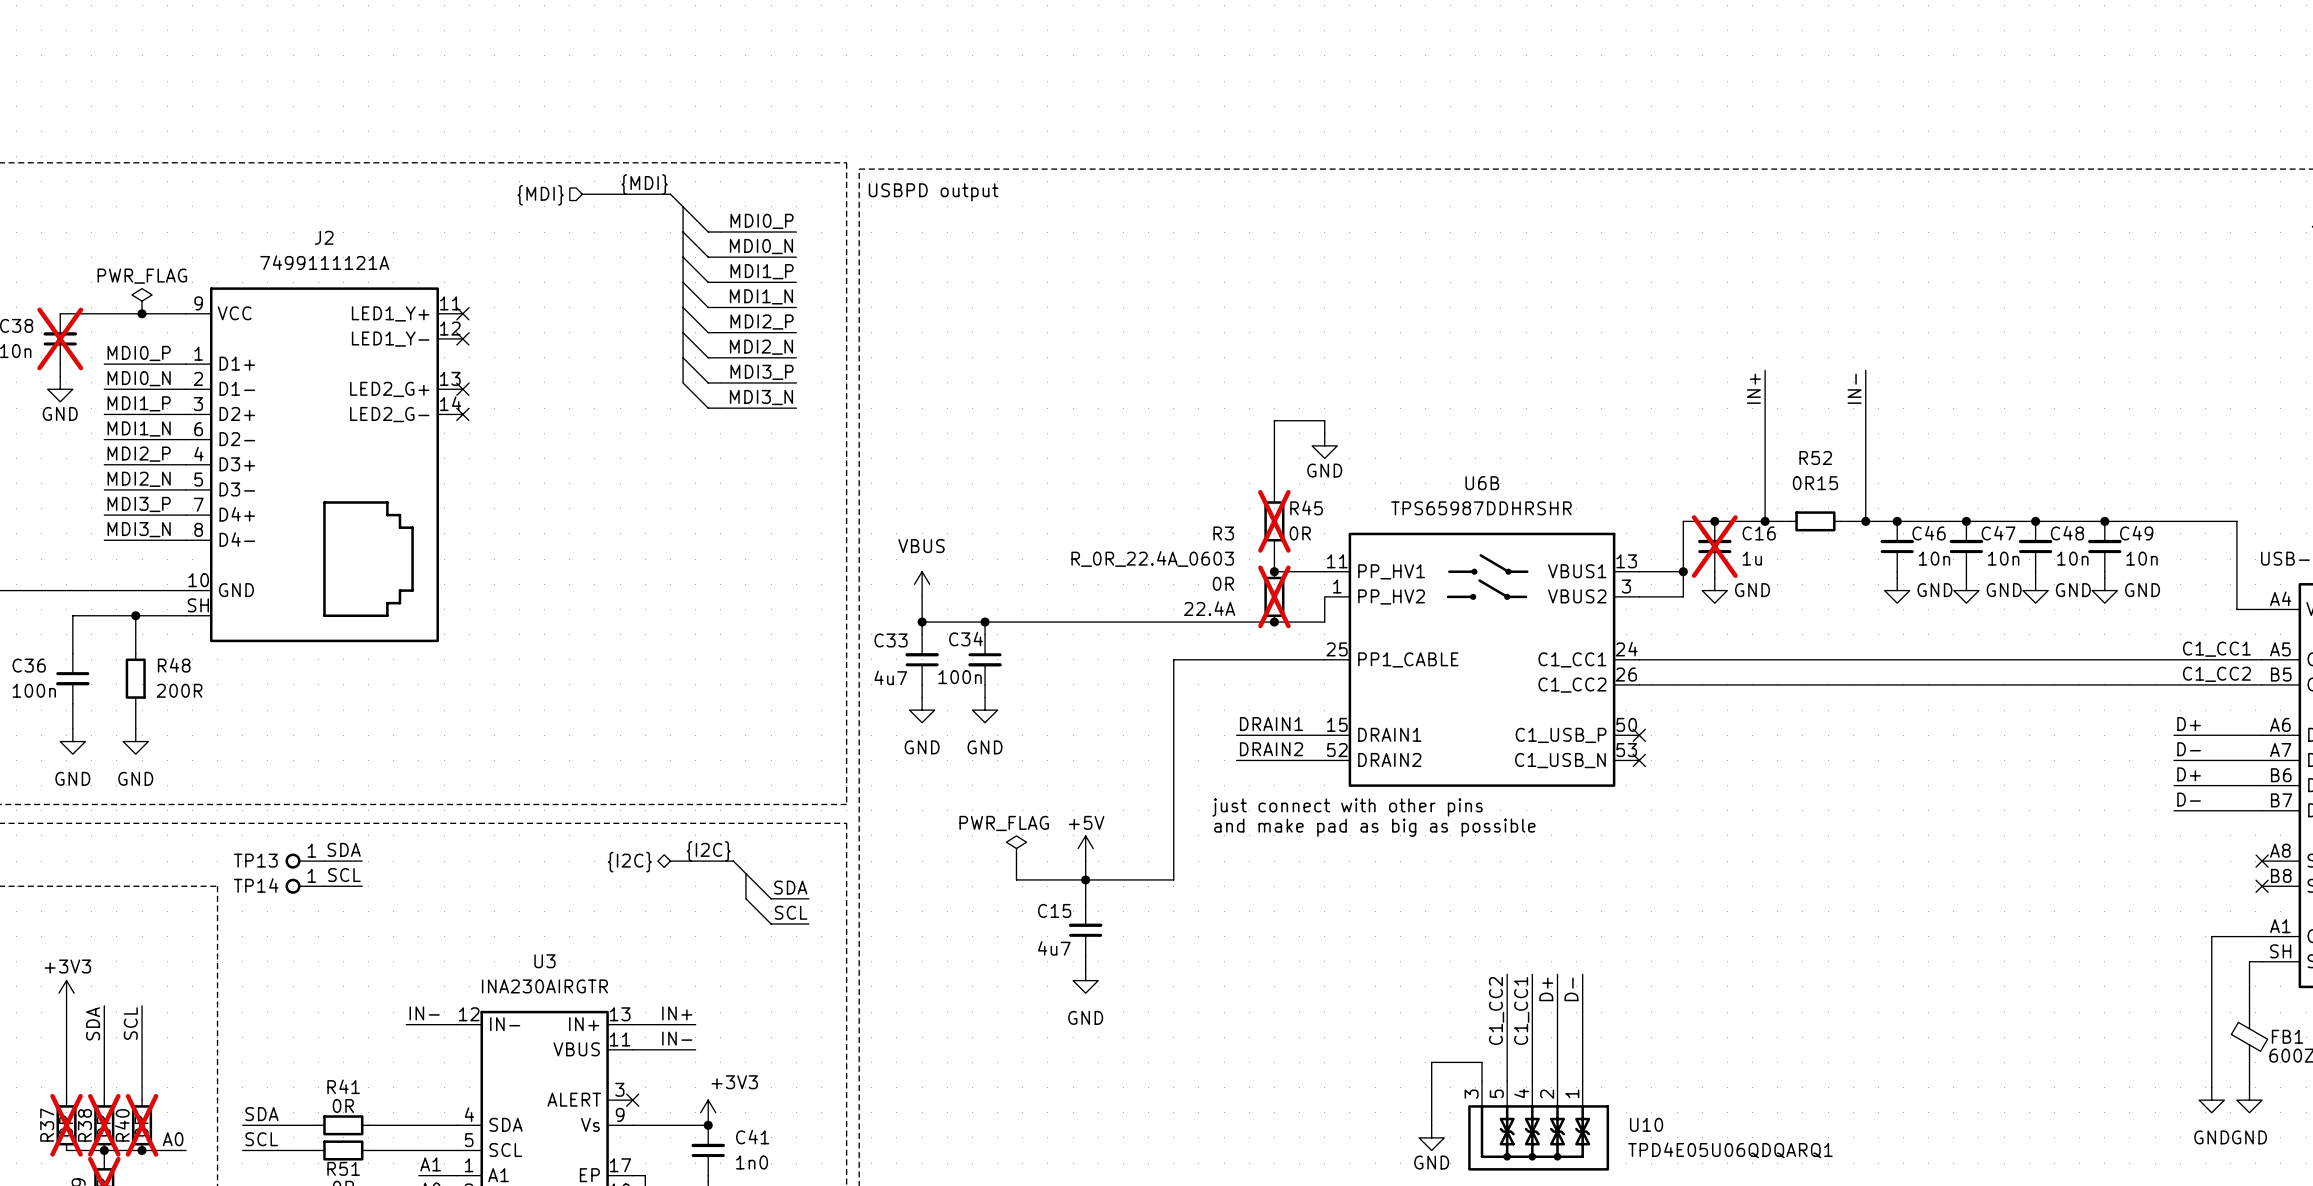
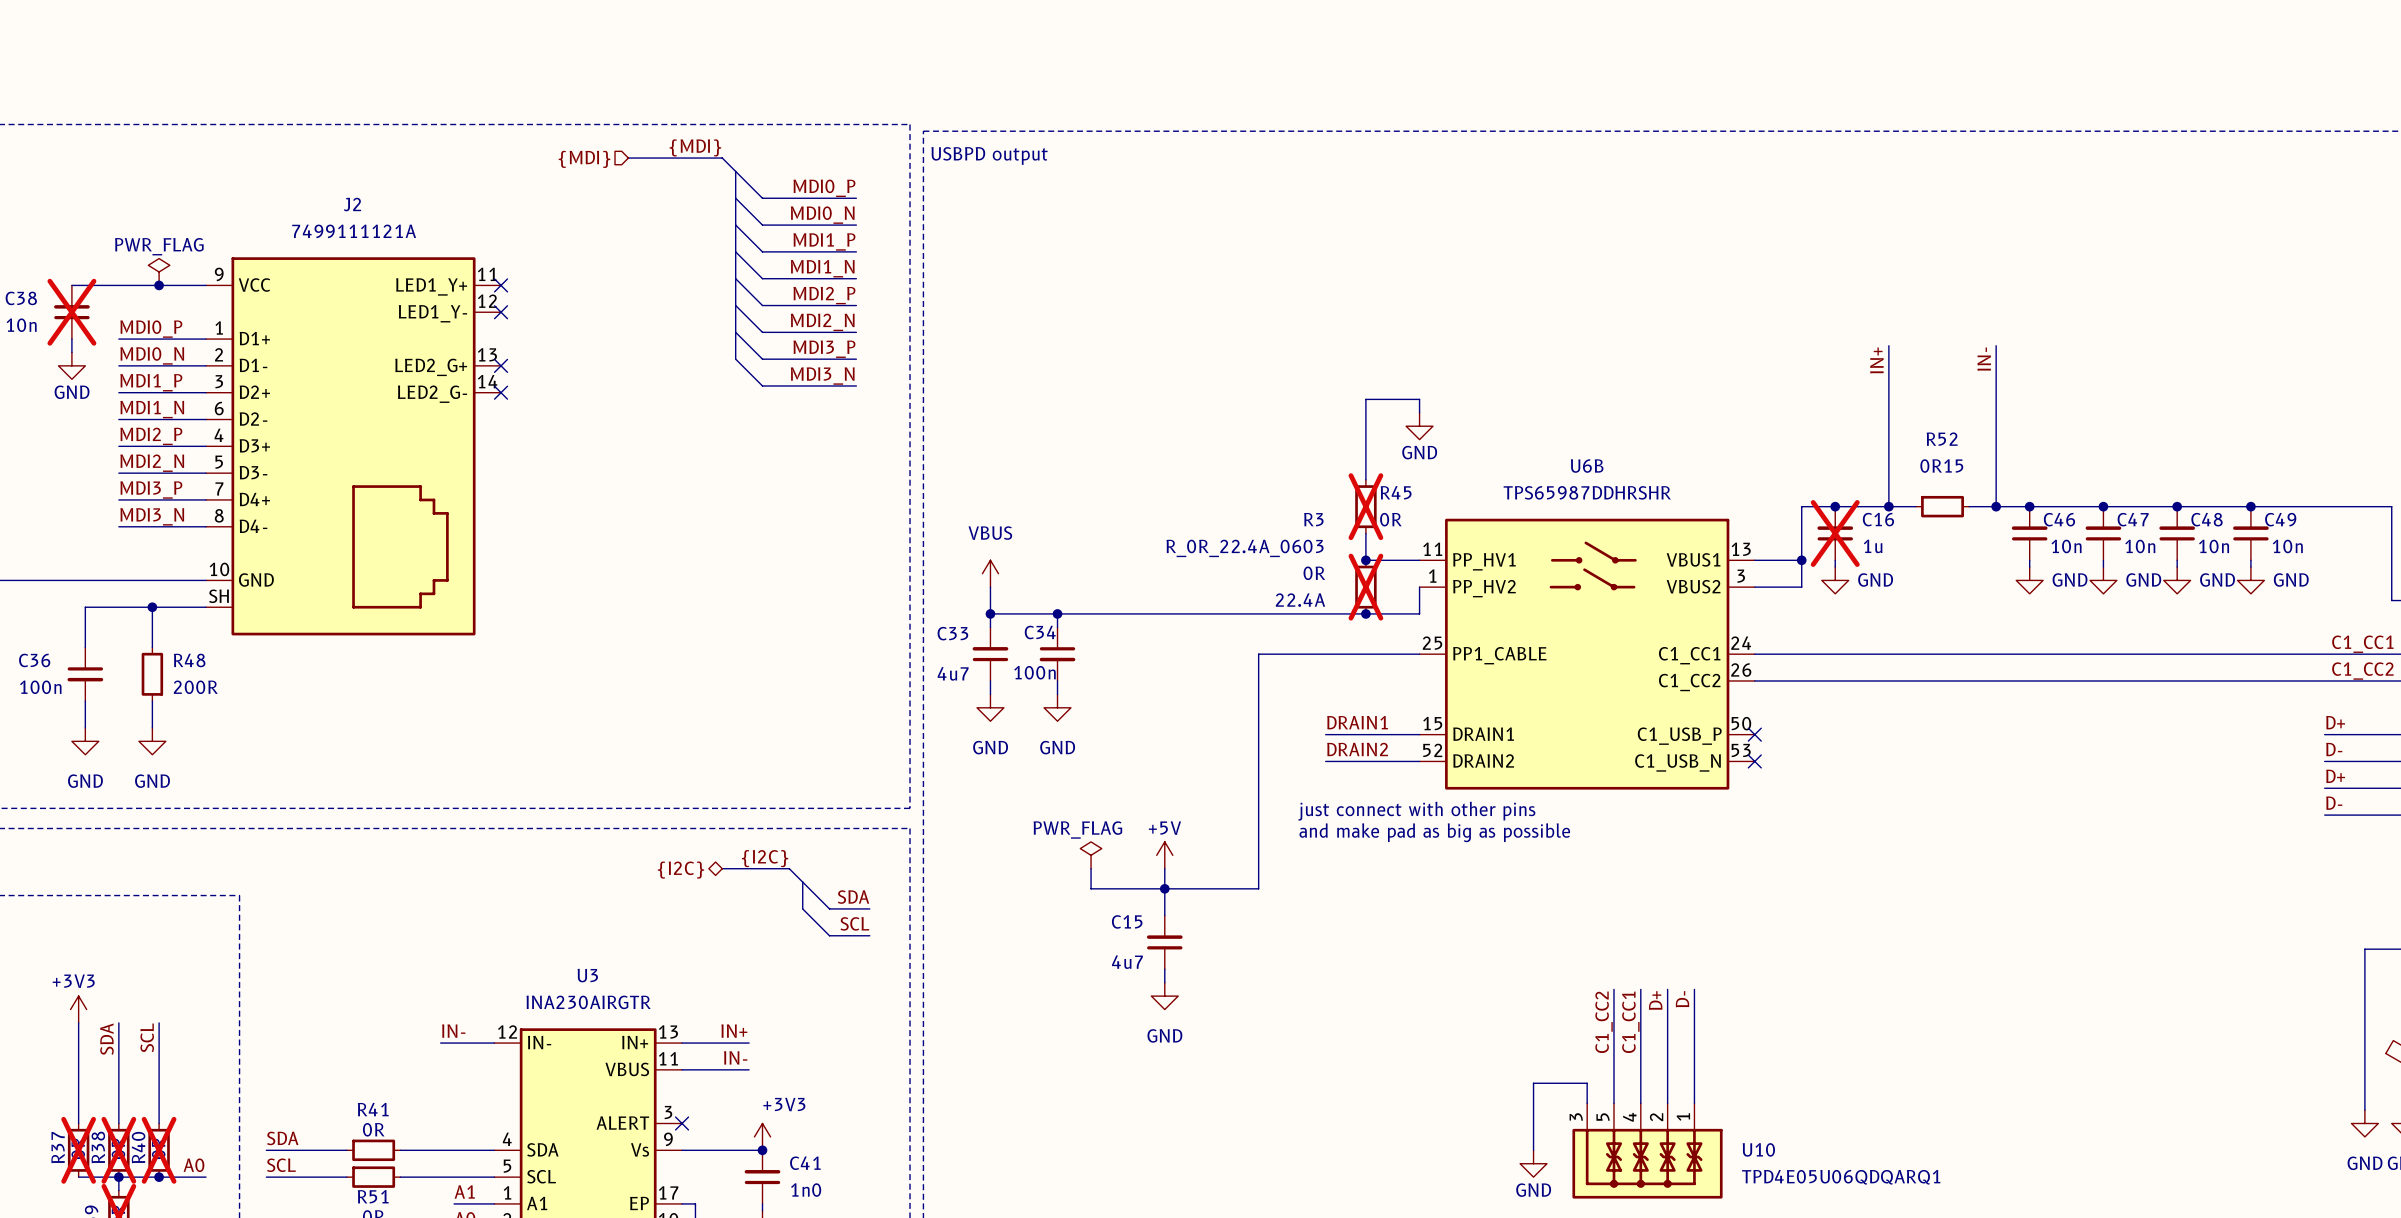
label: SDA (344, 849) -> none
TP13: (304, 861) -> none
wire: (324, 861) (362, 861) -> none
label: SCL (344, 875) -> none
TP14: (304, 886) -> none
wire: (324, 886) (362, 886) -> none

